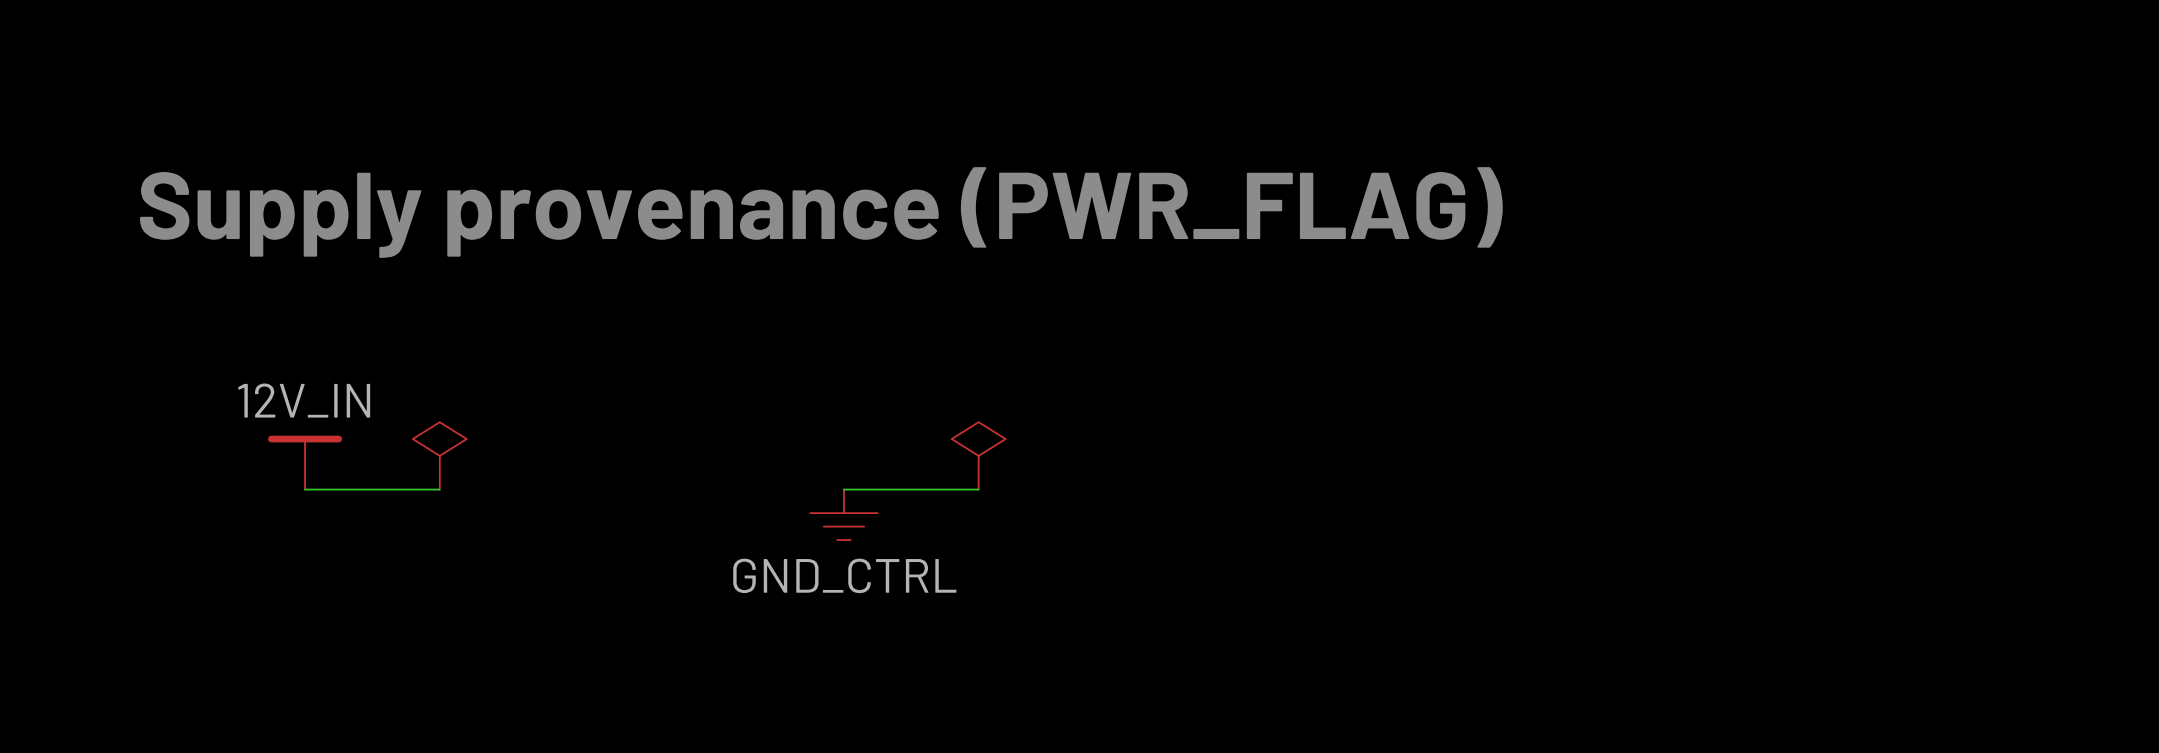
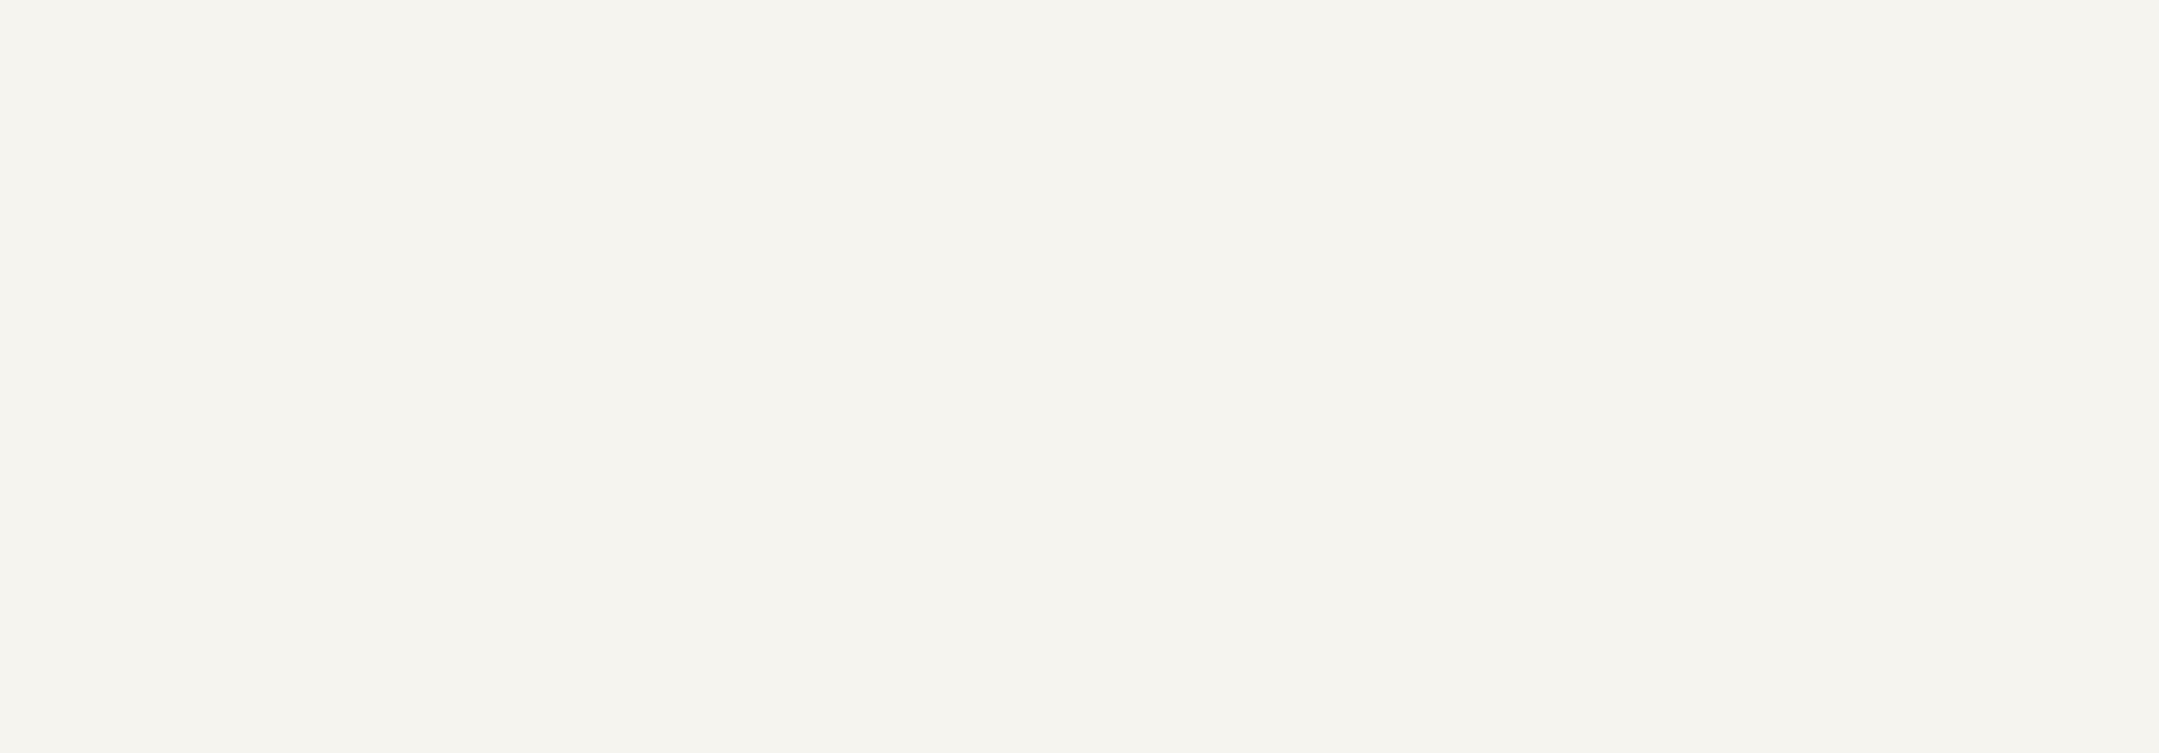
text: Supply provenance (PWR_FLAG) (821, 212) -> none
power symbol: (439, 455) -> none
power symbol: (978, 455) -> none
power symbol: 12V_IN (305, 462) -> none
wire: (305, 489) (439, 489) -> none
wire: (843, 489) (978, 489) -> none
power symbol: GND_CTRL (843, 514) -> none

